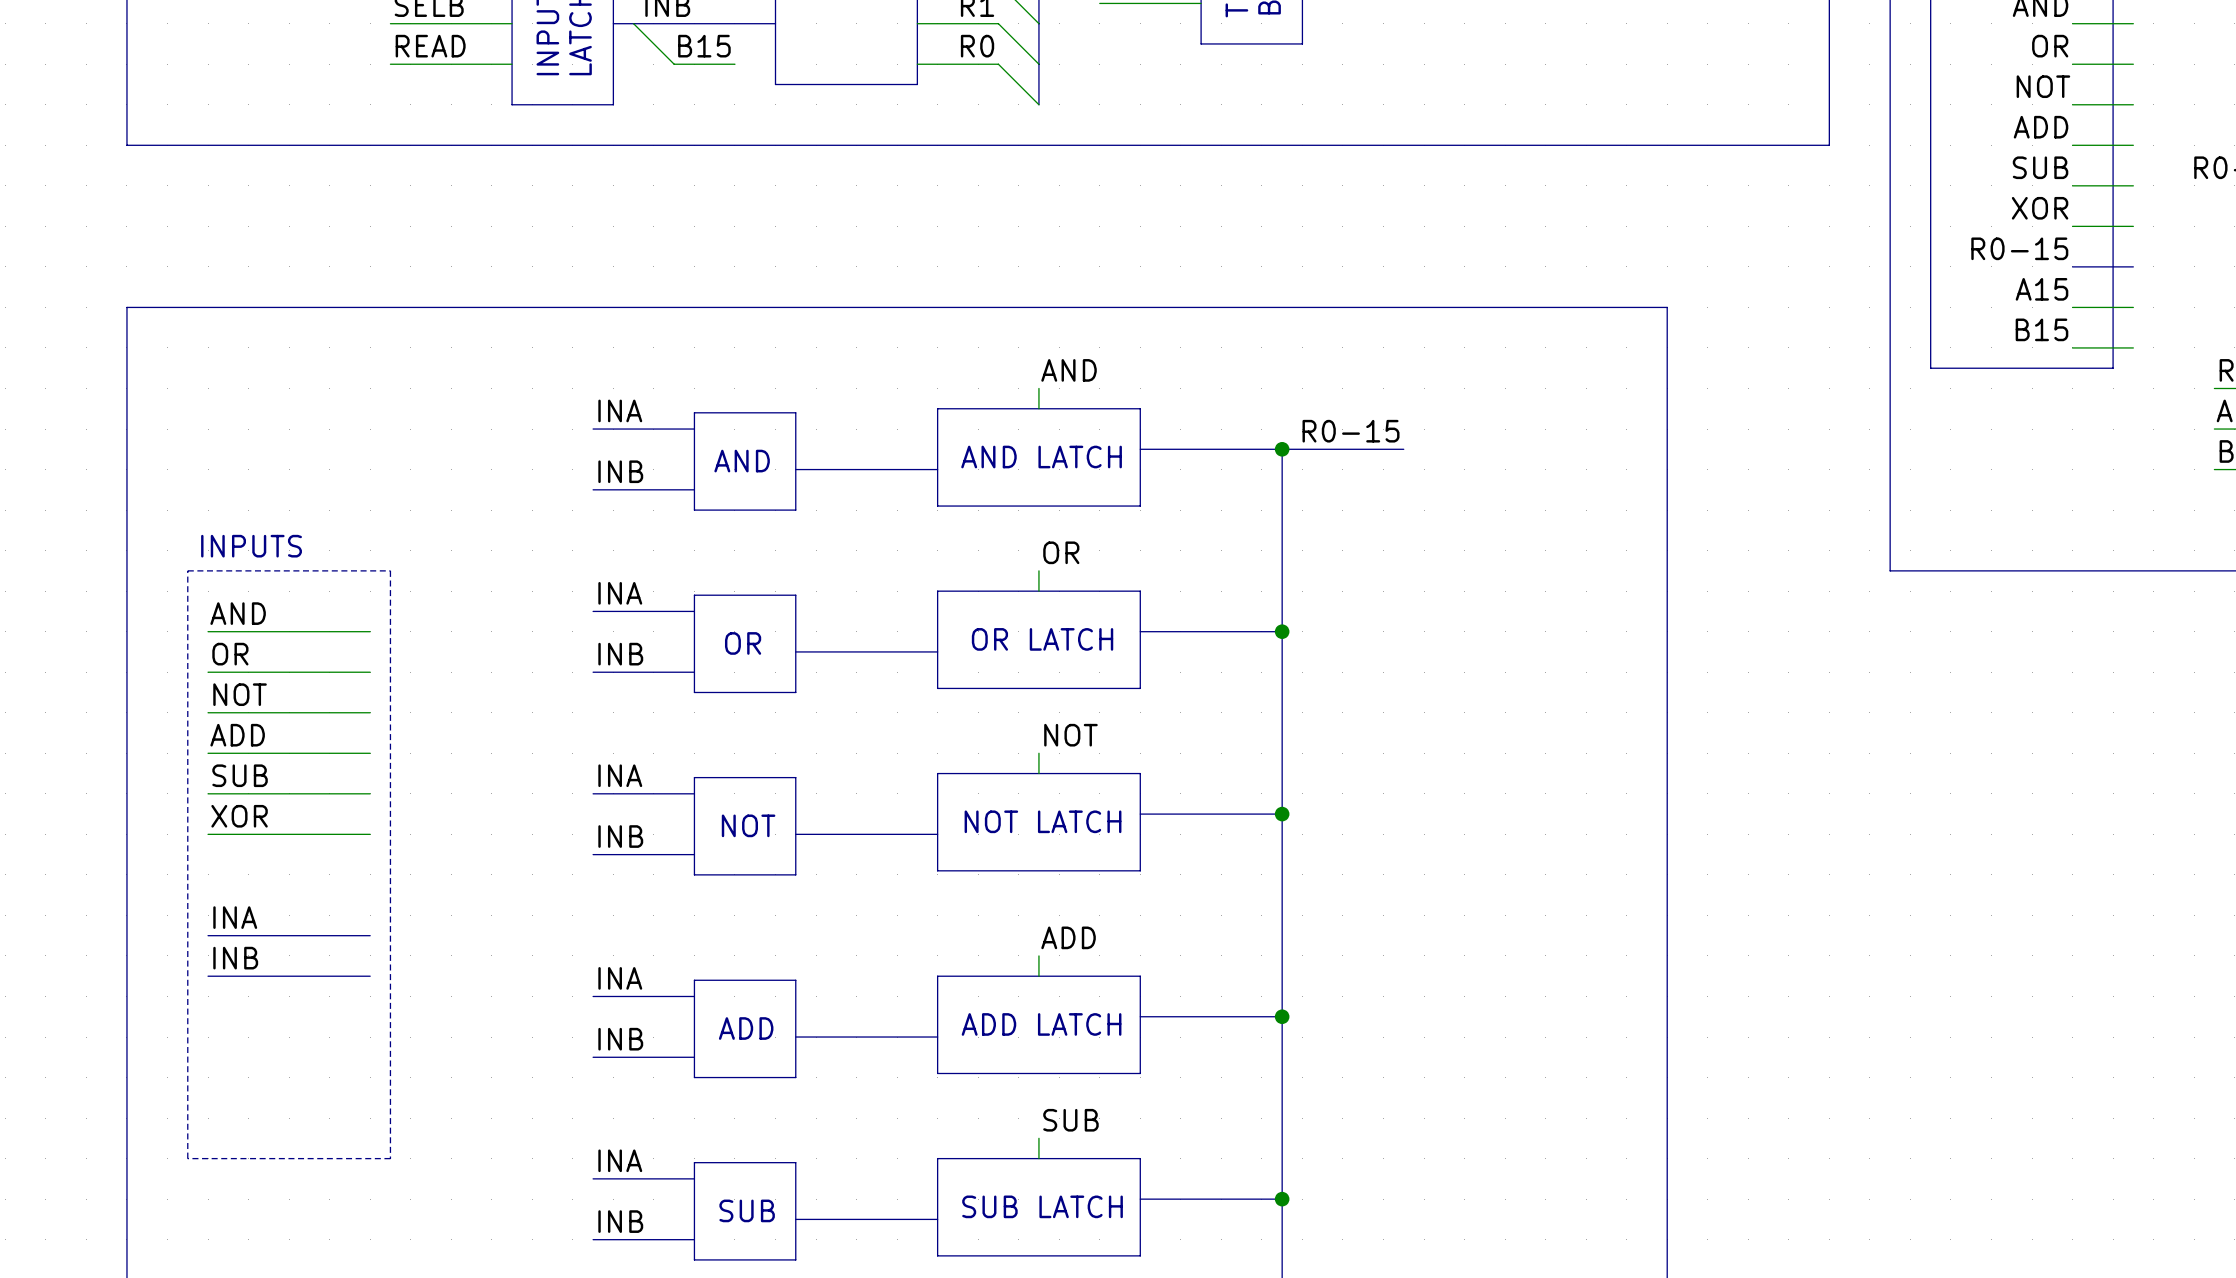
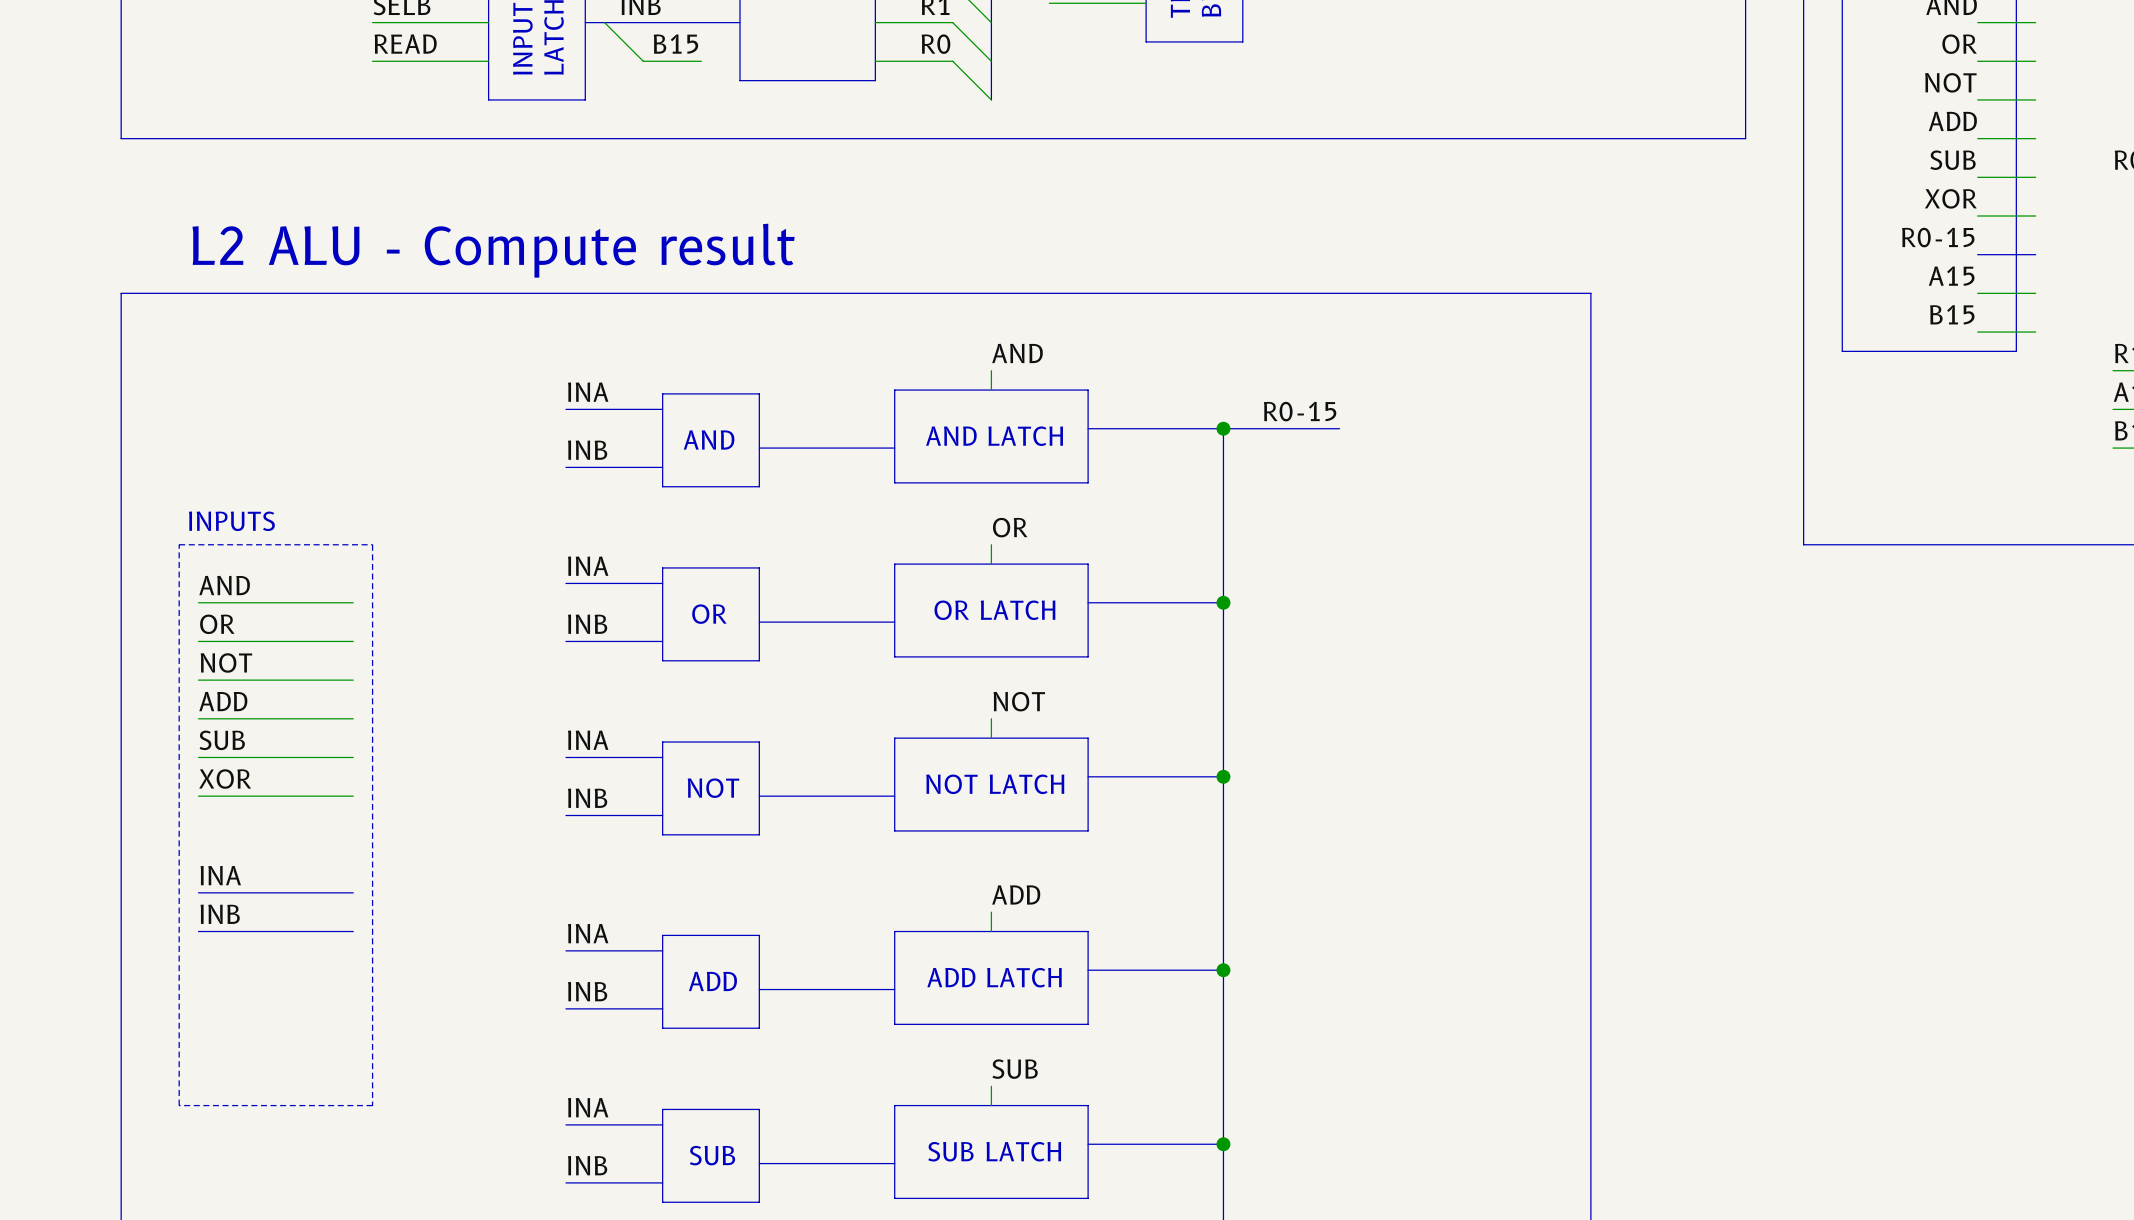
text: none -> L2 ALU - Compute result (493, 250)

